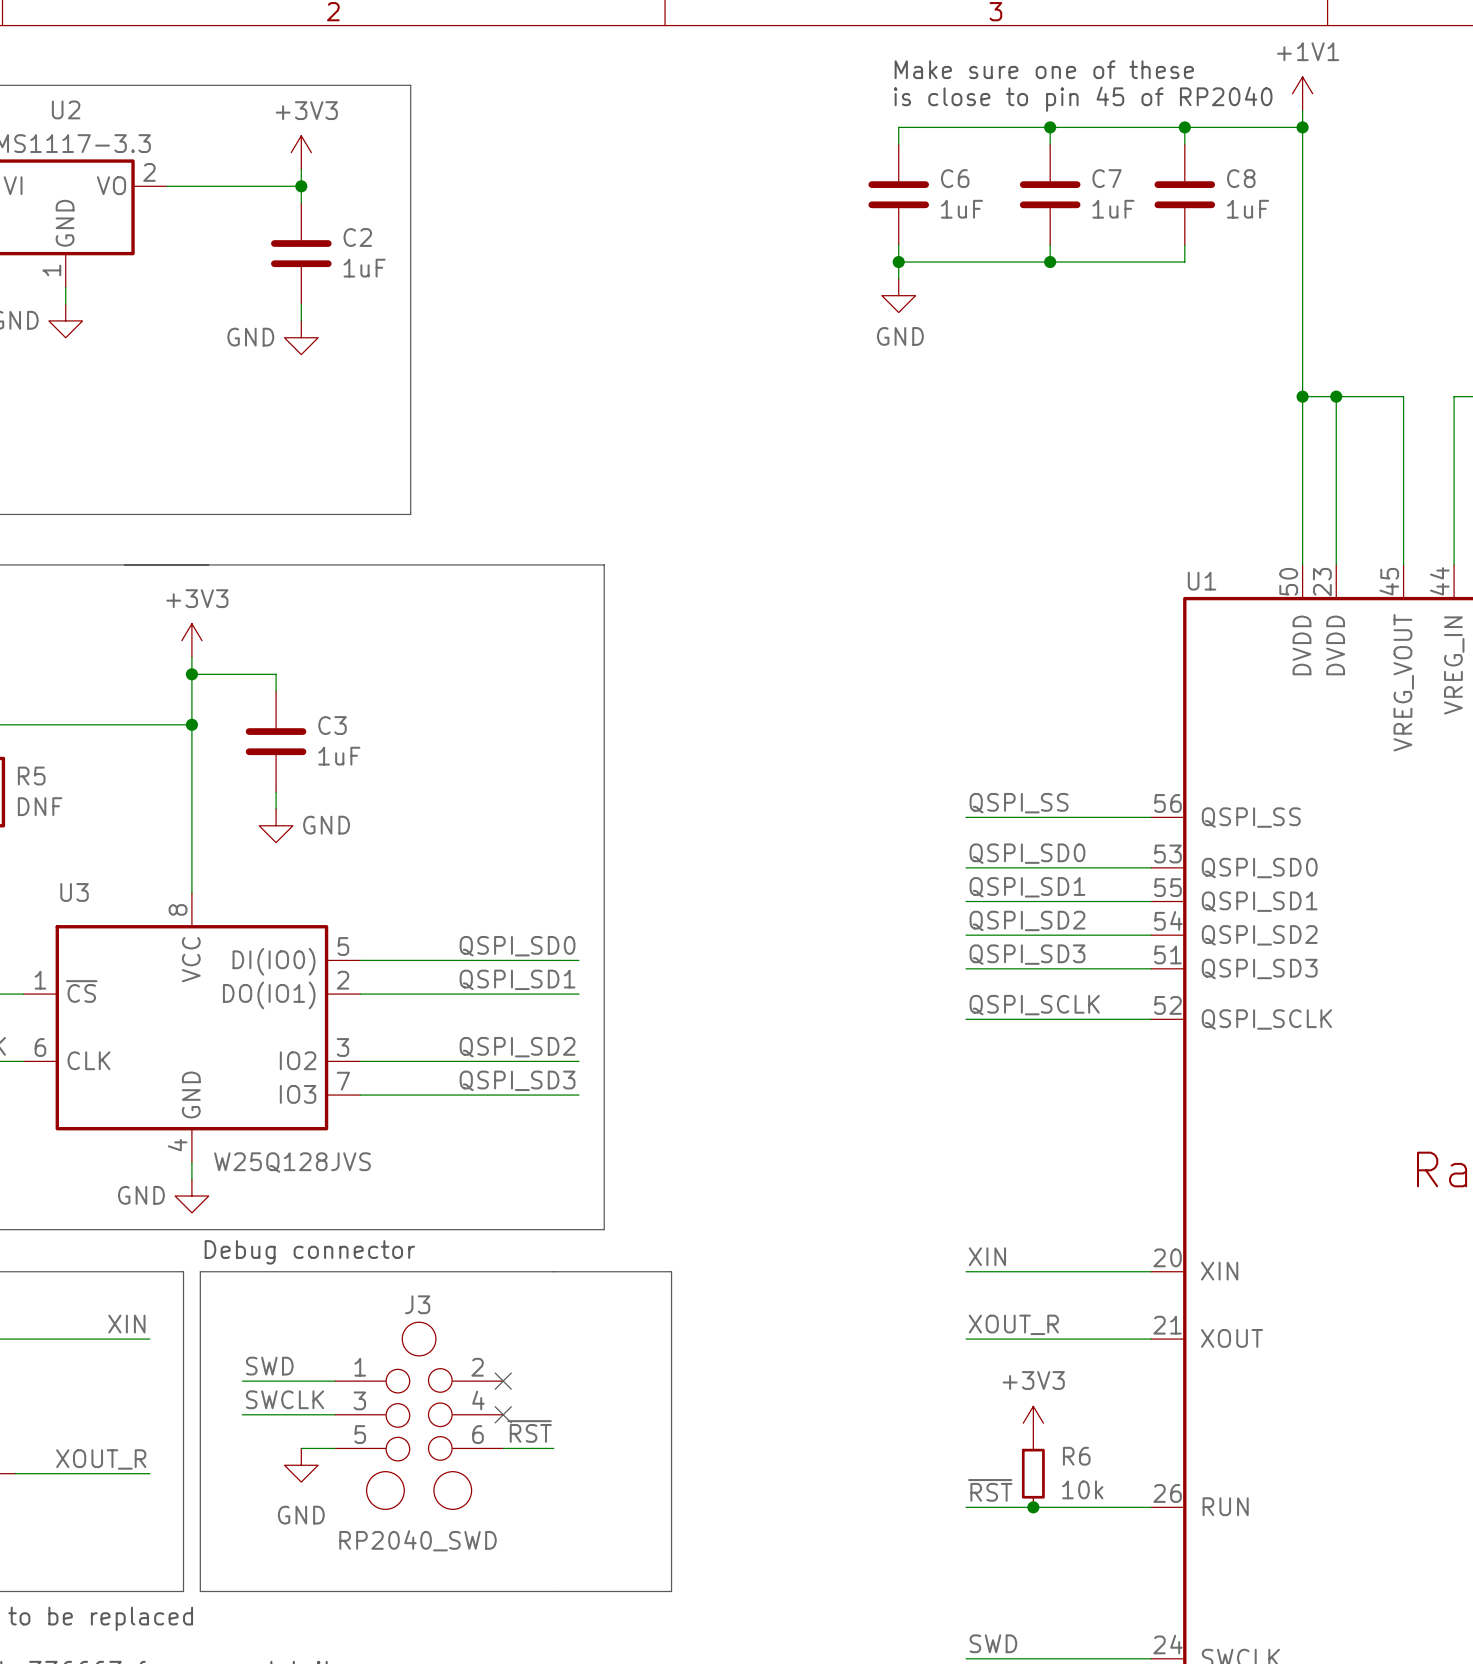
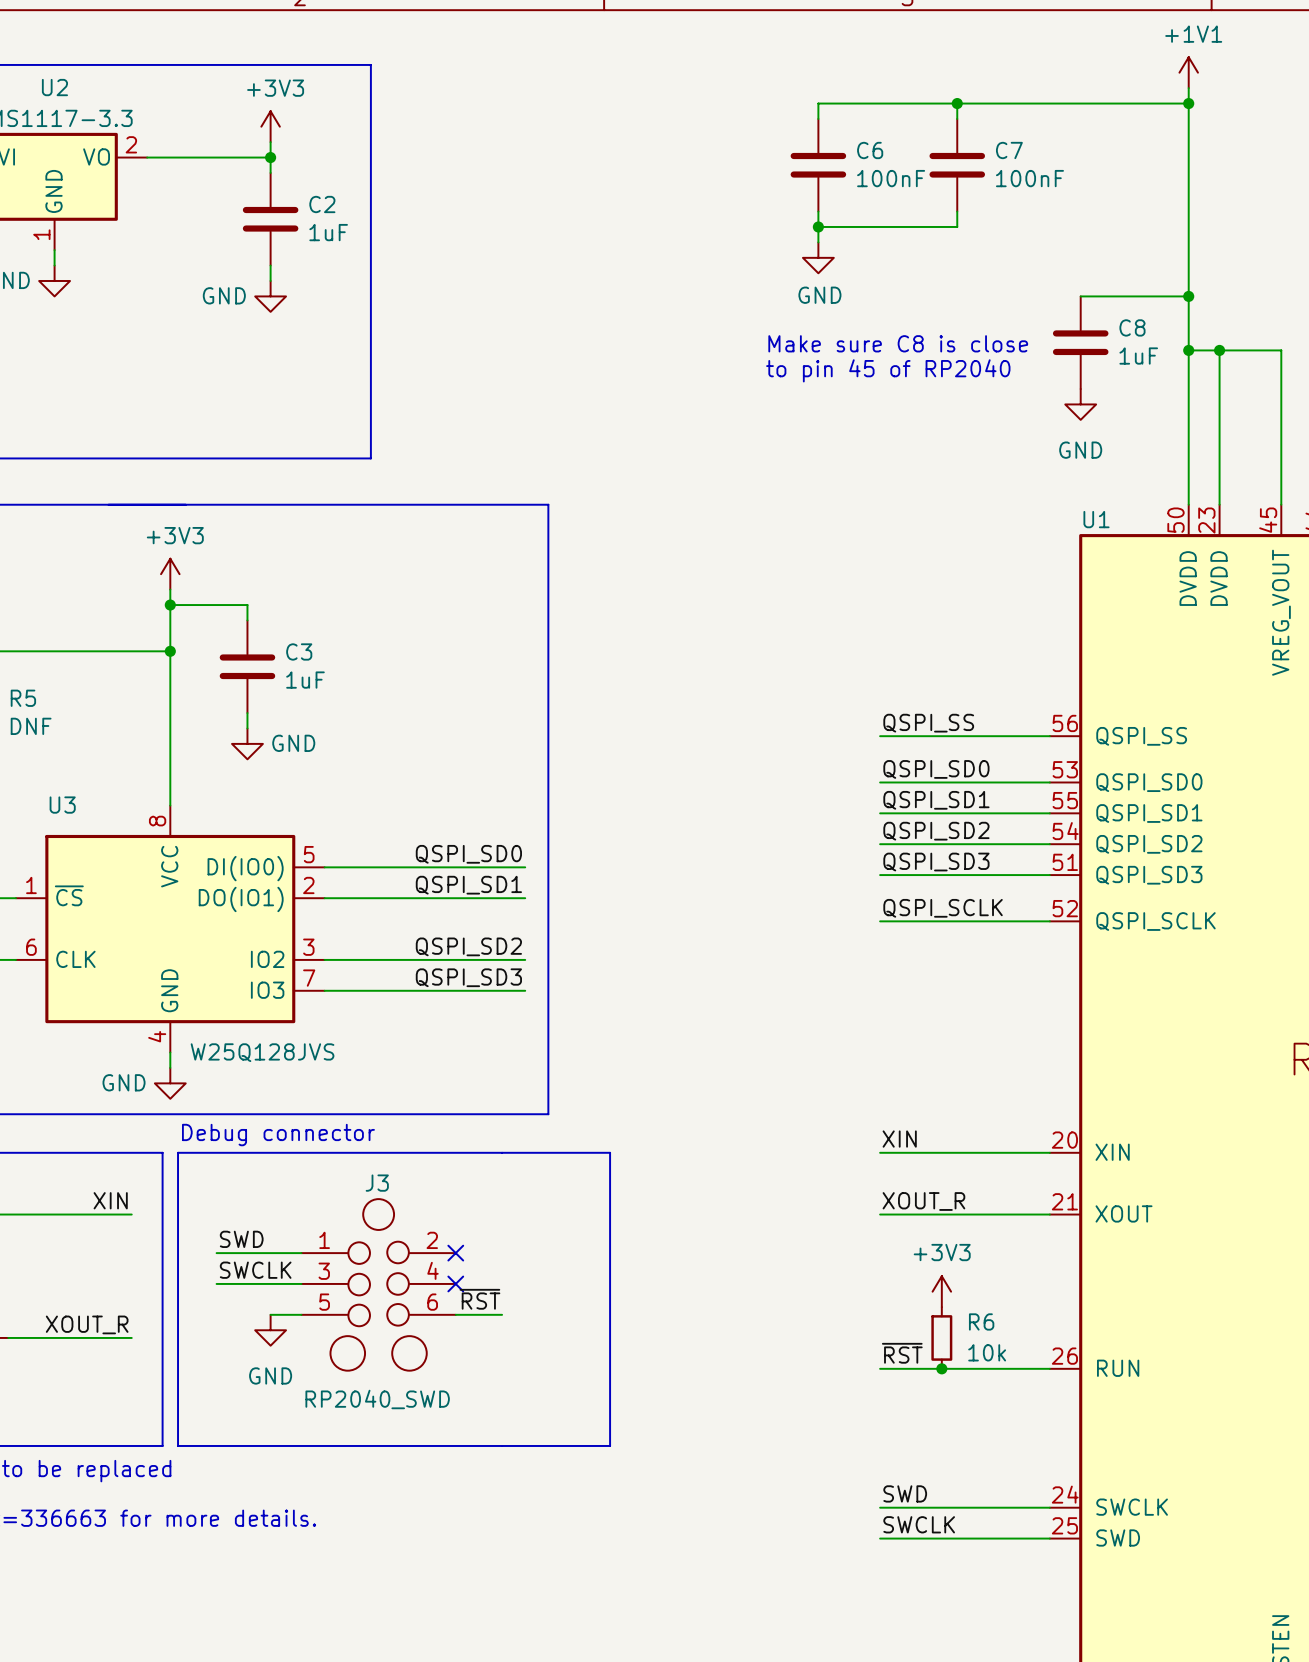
text: Make sure one of these (1044, 69) -> none
text: is close to pin 45 of RP2040 (1083, 99) -> none
wire: (1184, 127) (1184, 144) -> none
junction: (1184, 127) -> none
C8 position: (1184, 194) -> (1080, 342)
C6 value: 1uF (961, 209) -> 100nF (891, 178)
C7 value: 1uF (1113, 209) -> 100nF (1029, 178)
wire: (1184, 245) (1184, 262) (1050, 262) -> none
junction: (1050, 262) -> none
wire: none -> (1080, 296) (1188, 296)
junction: none -> (1188, 296)
text: none -> Make sure C8 is close (898, 343)
text: none -> to pin 45 of RP2040 (888, 370)
power symbol: none -> GND (1080, 404)

